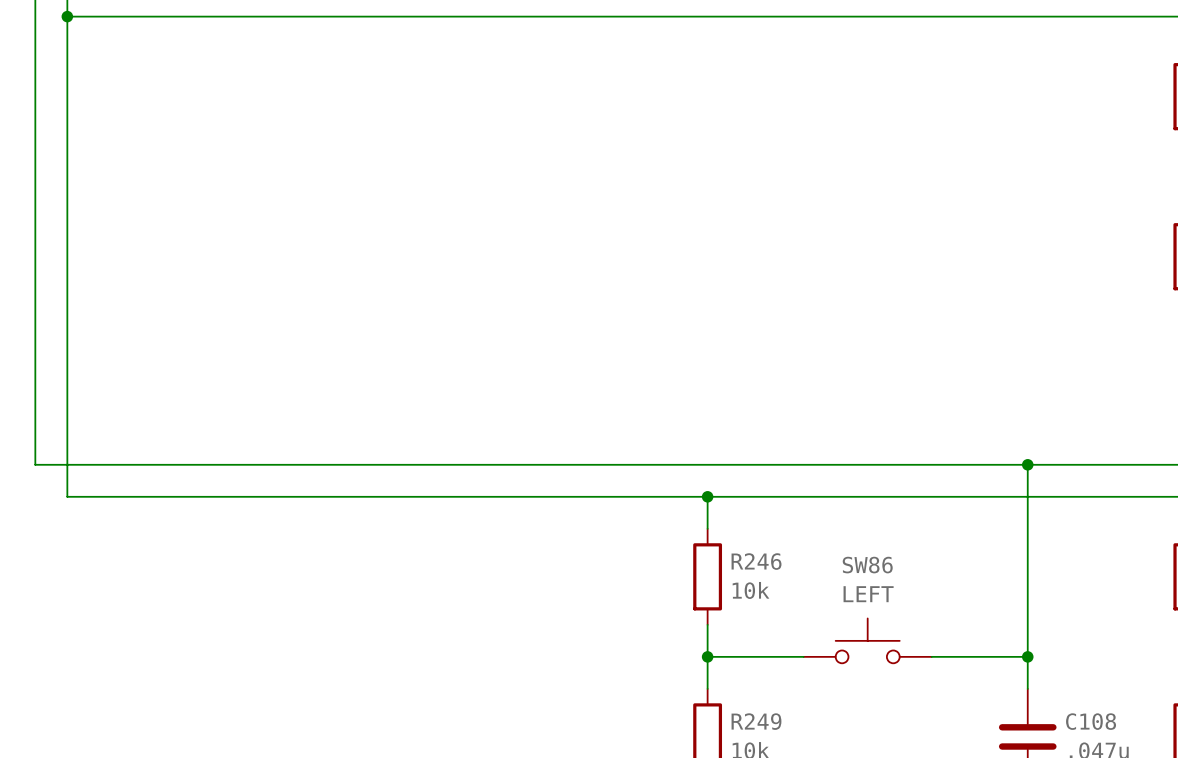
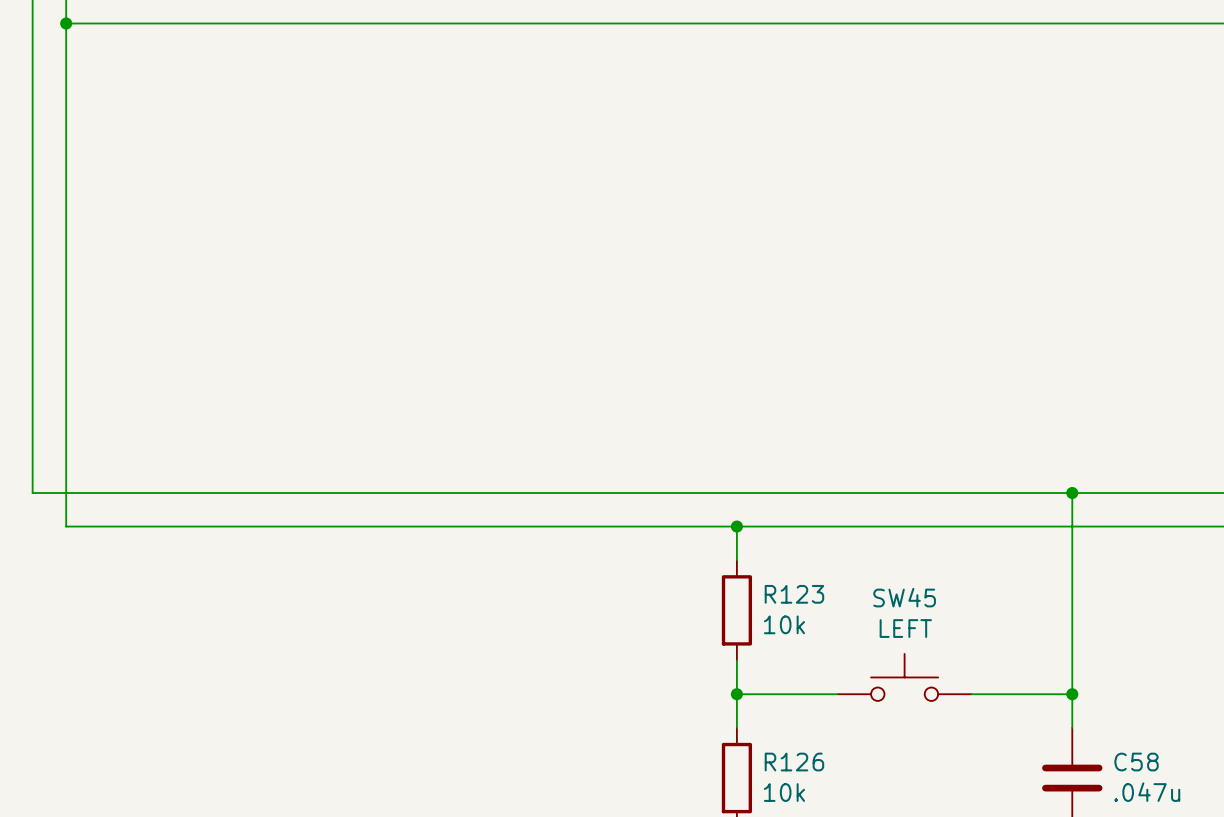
R246 name: R246 (756, 561) -> R123 (794, 594)
SW86 name: SW86 (867, 565) -> SW45 (904, 597)
R249 name: R249 (756, 721) -> R126 (794, 762)
C108 name: C108 (1091, 721) -> C58 (1136, 762)

